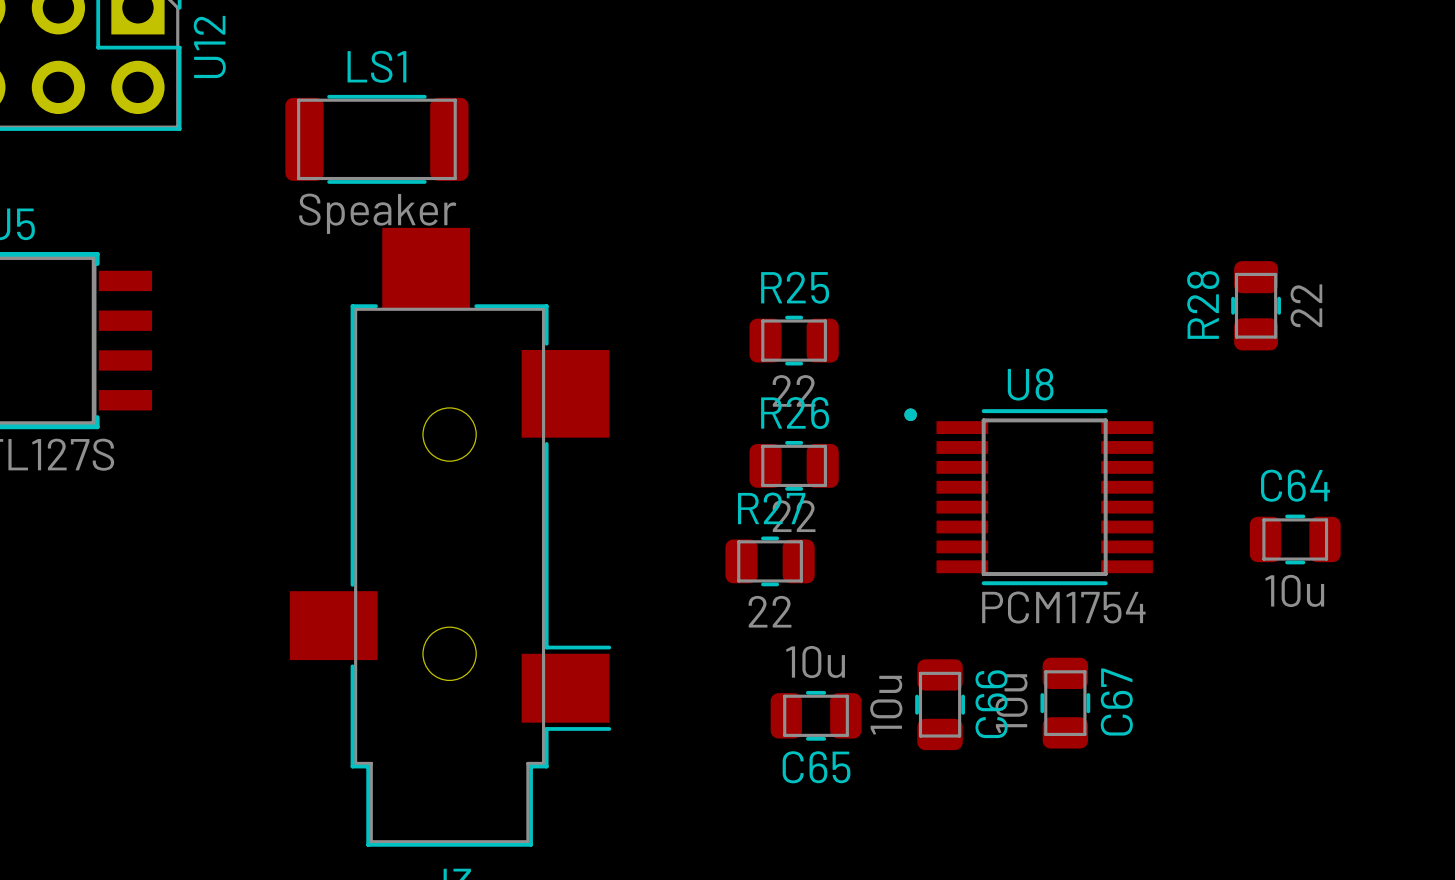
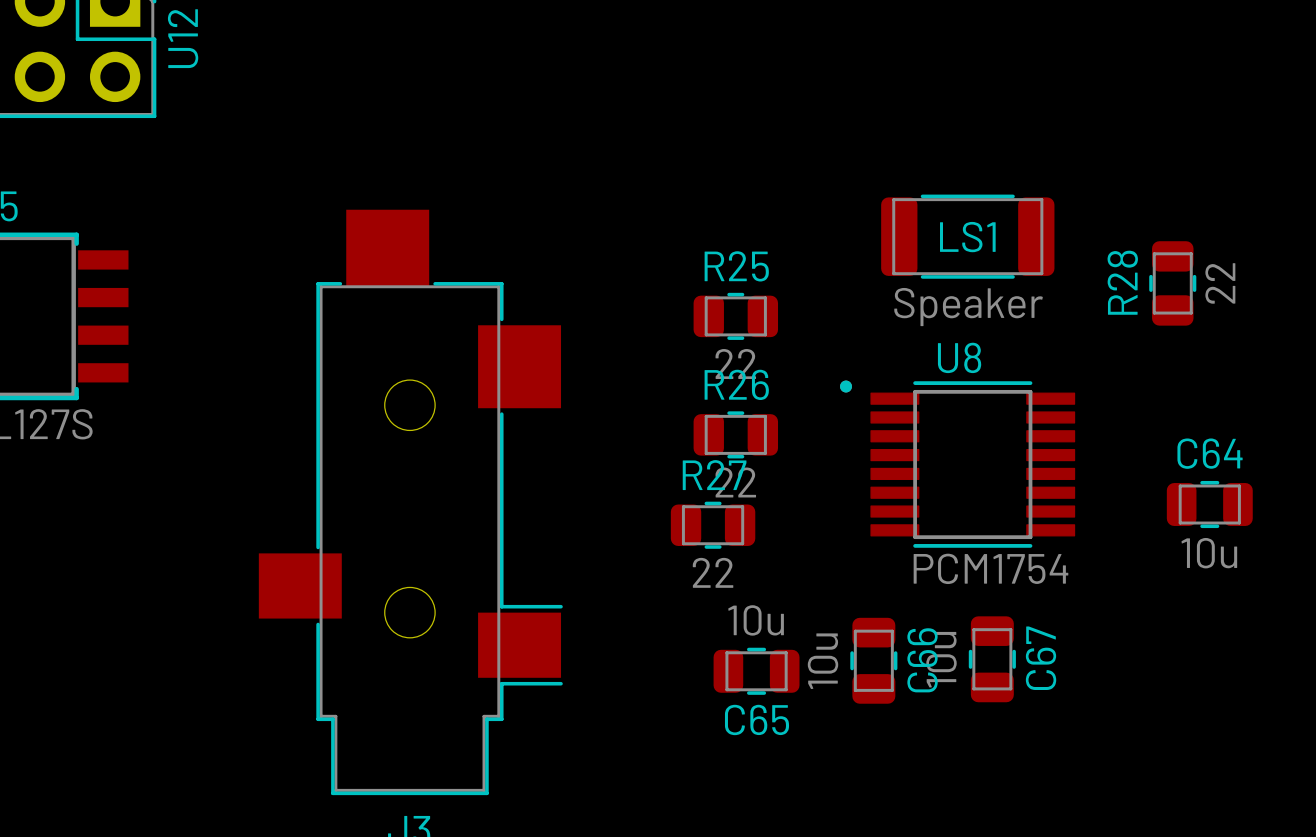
LS1 name position: LS1 (376, 66) -> LS1 (967, 237)
LS1 position: (376, 139) -> (967, 236)

